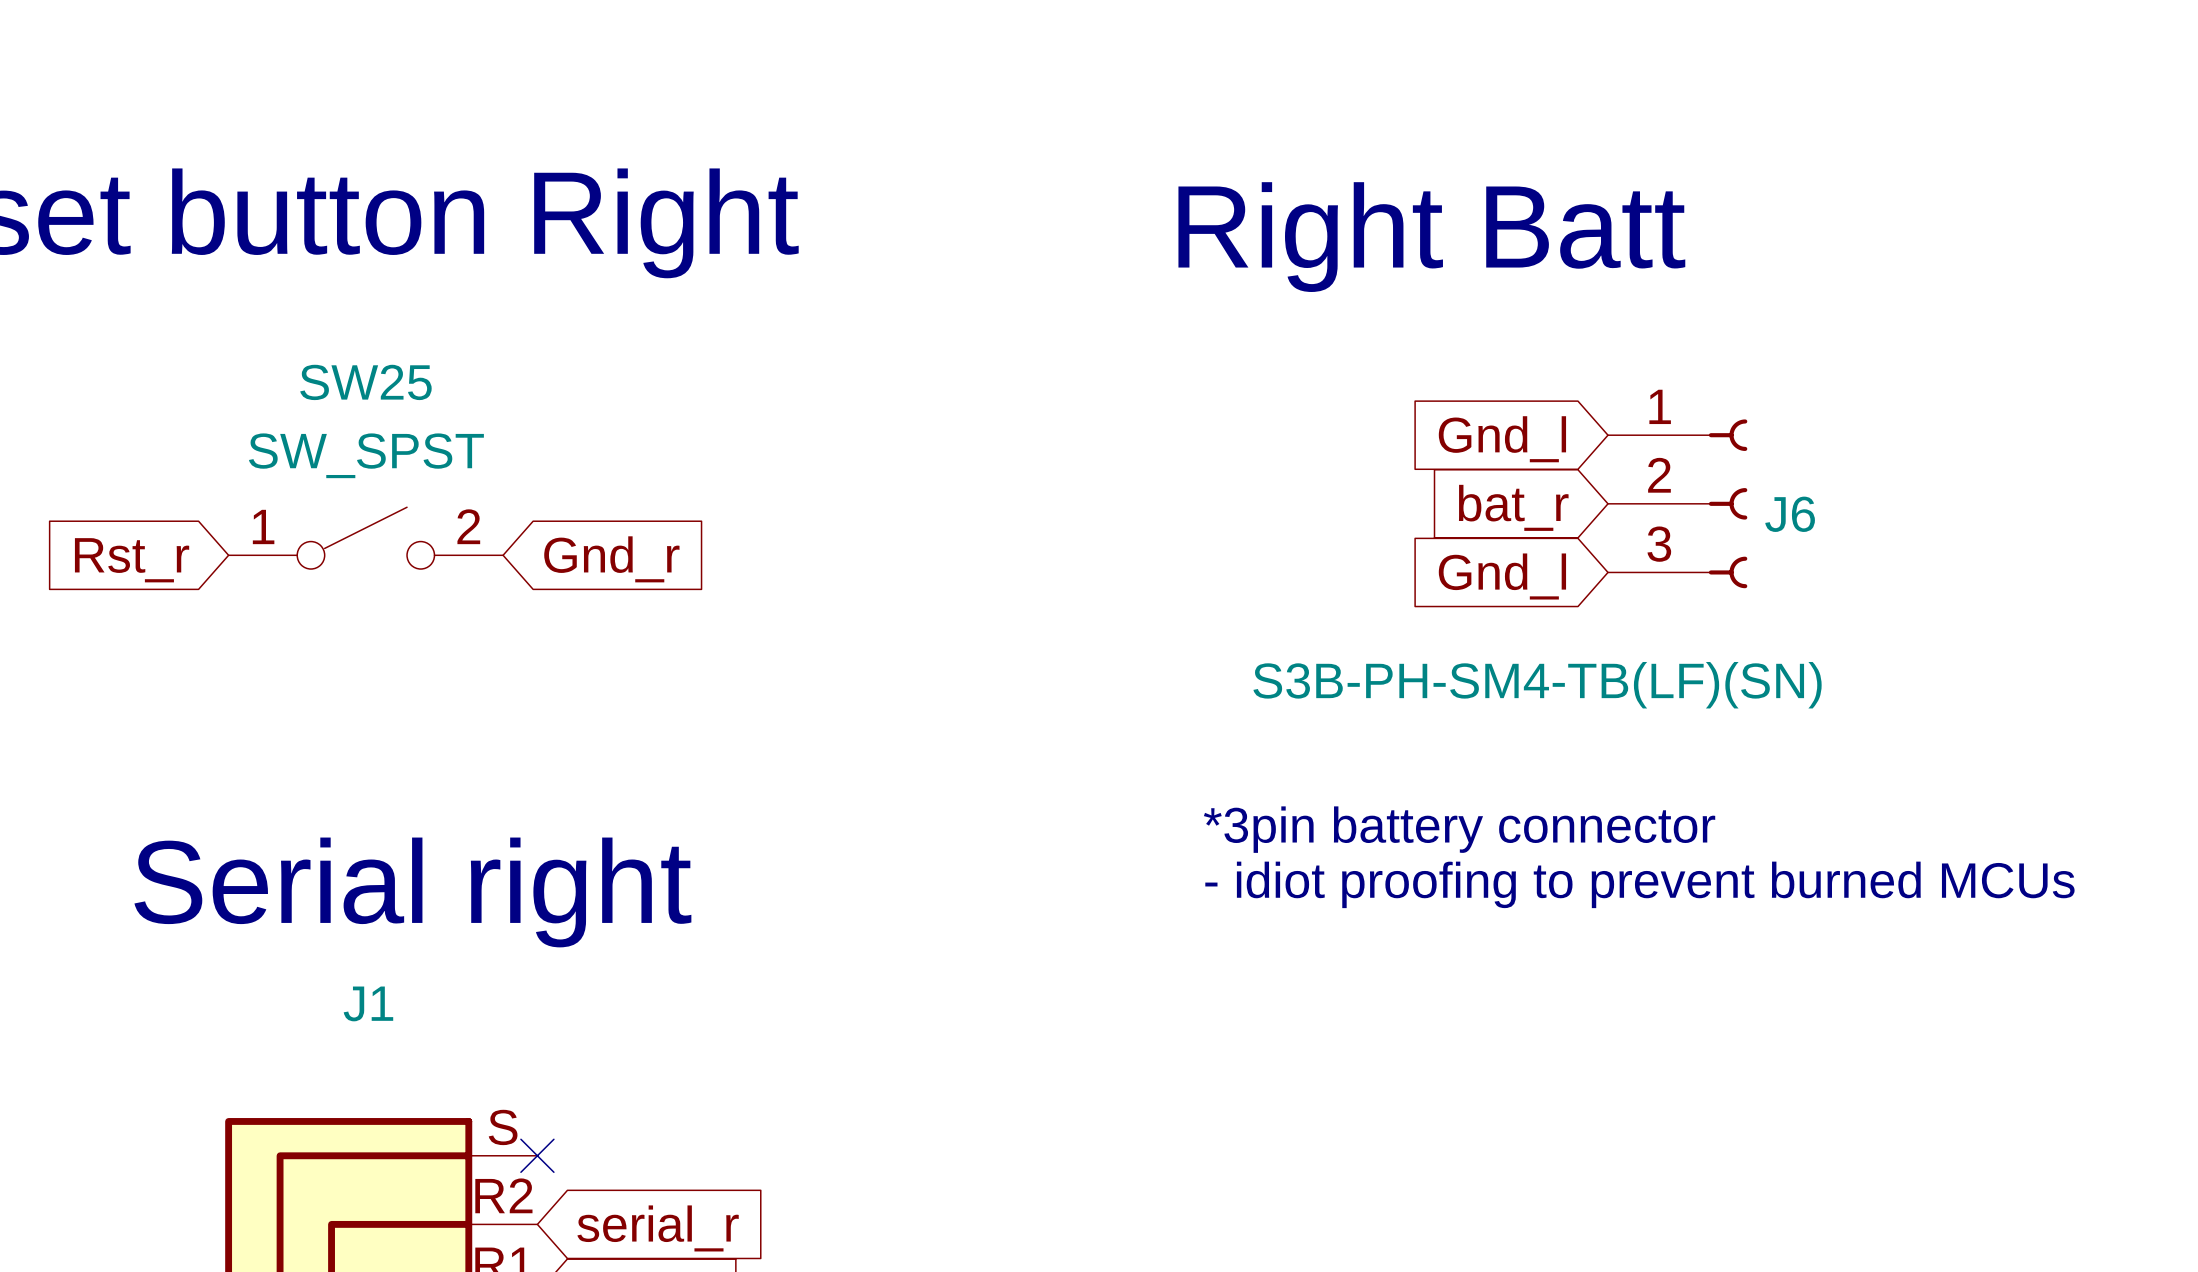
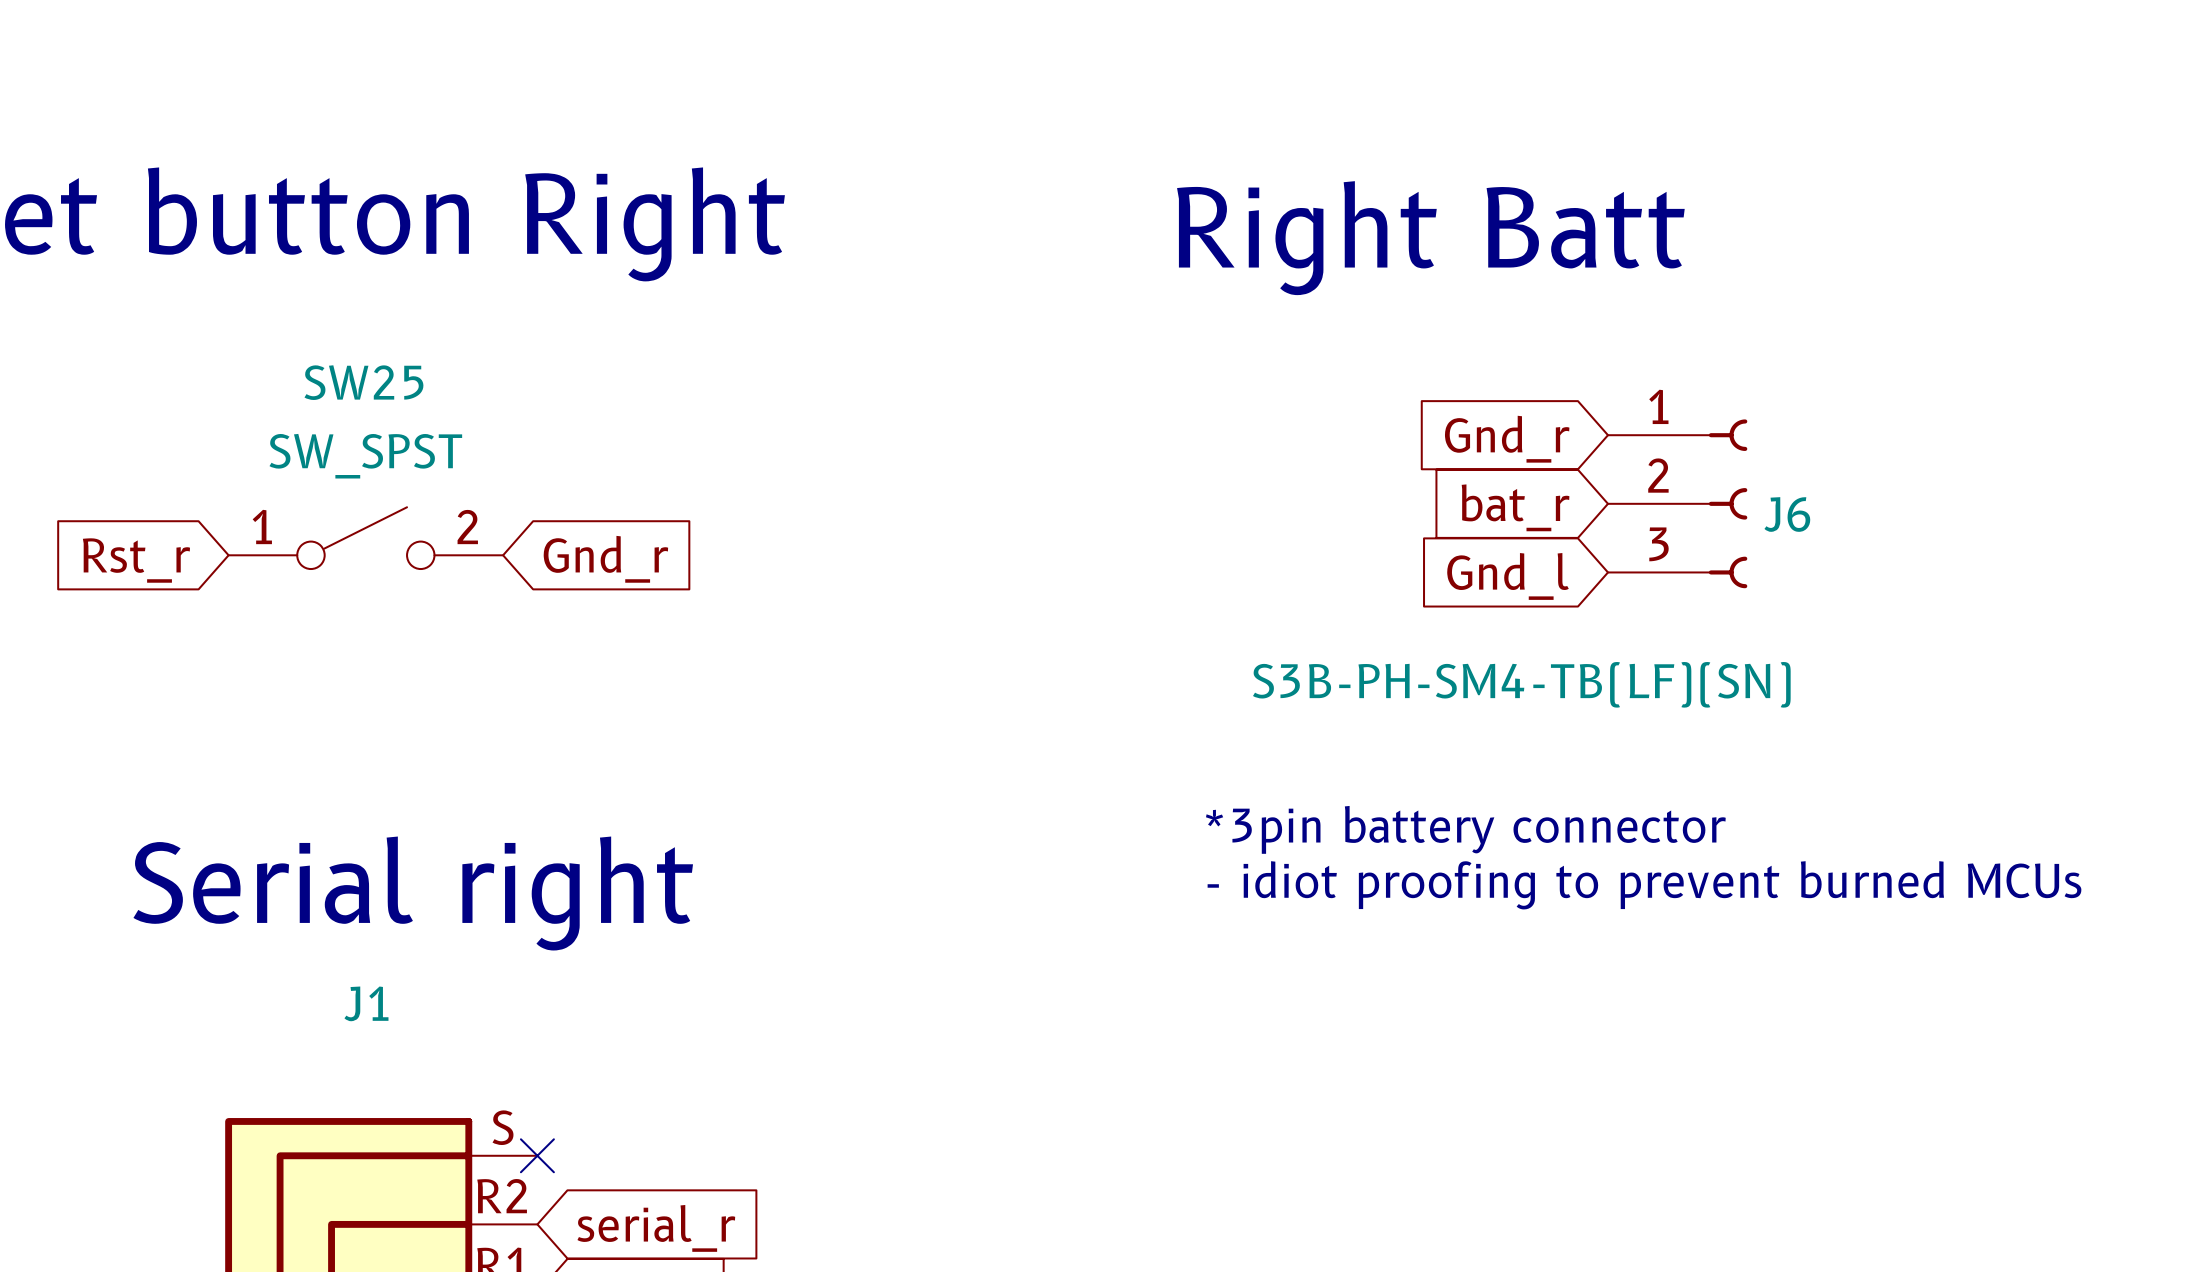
global label: Gnd_l (1502, 439) -> Gnd_r (1507, 439)

